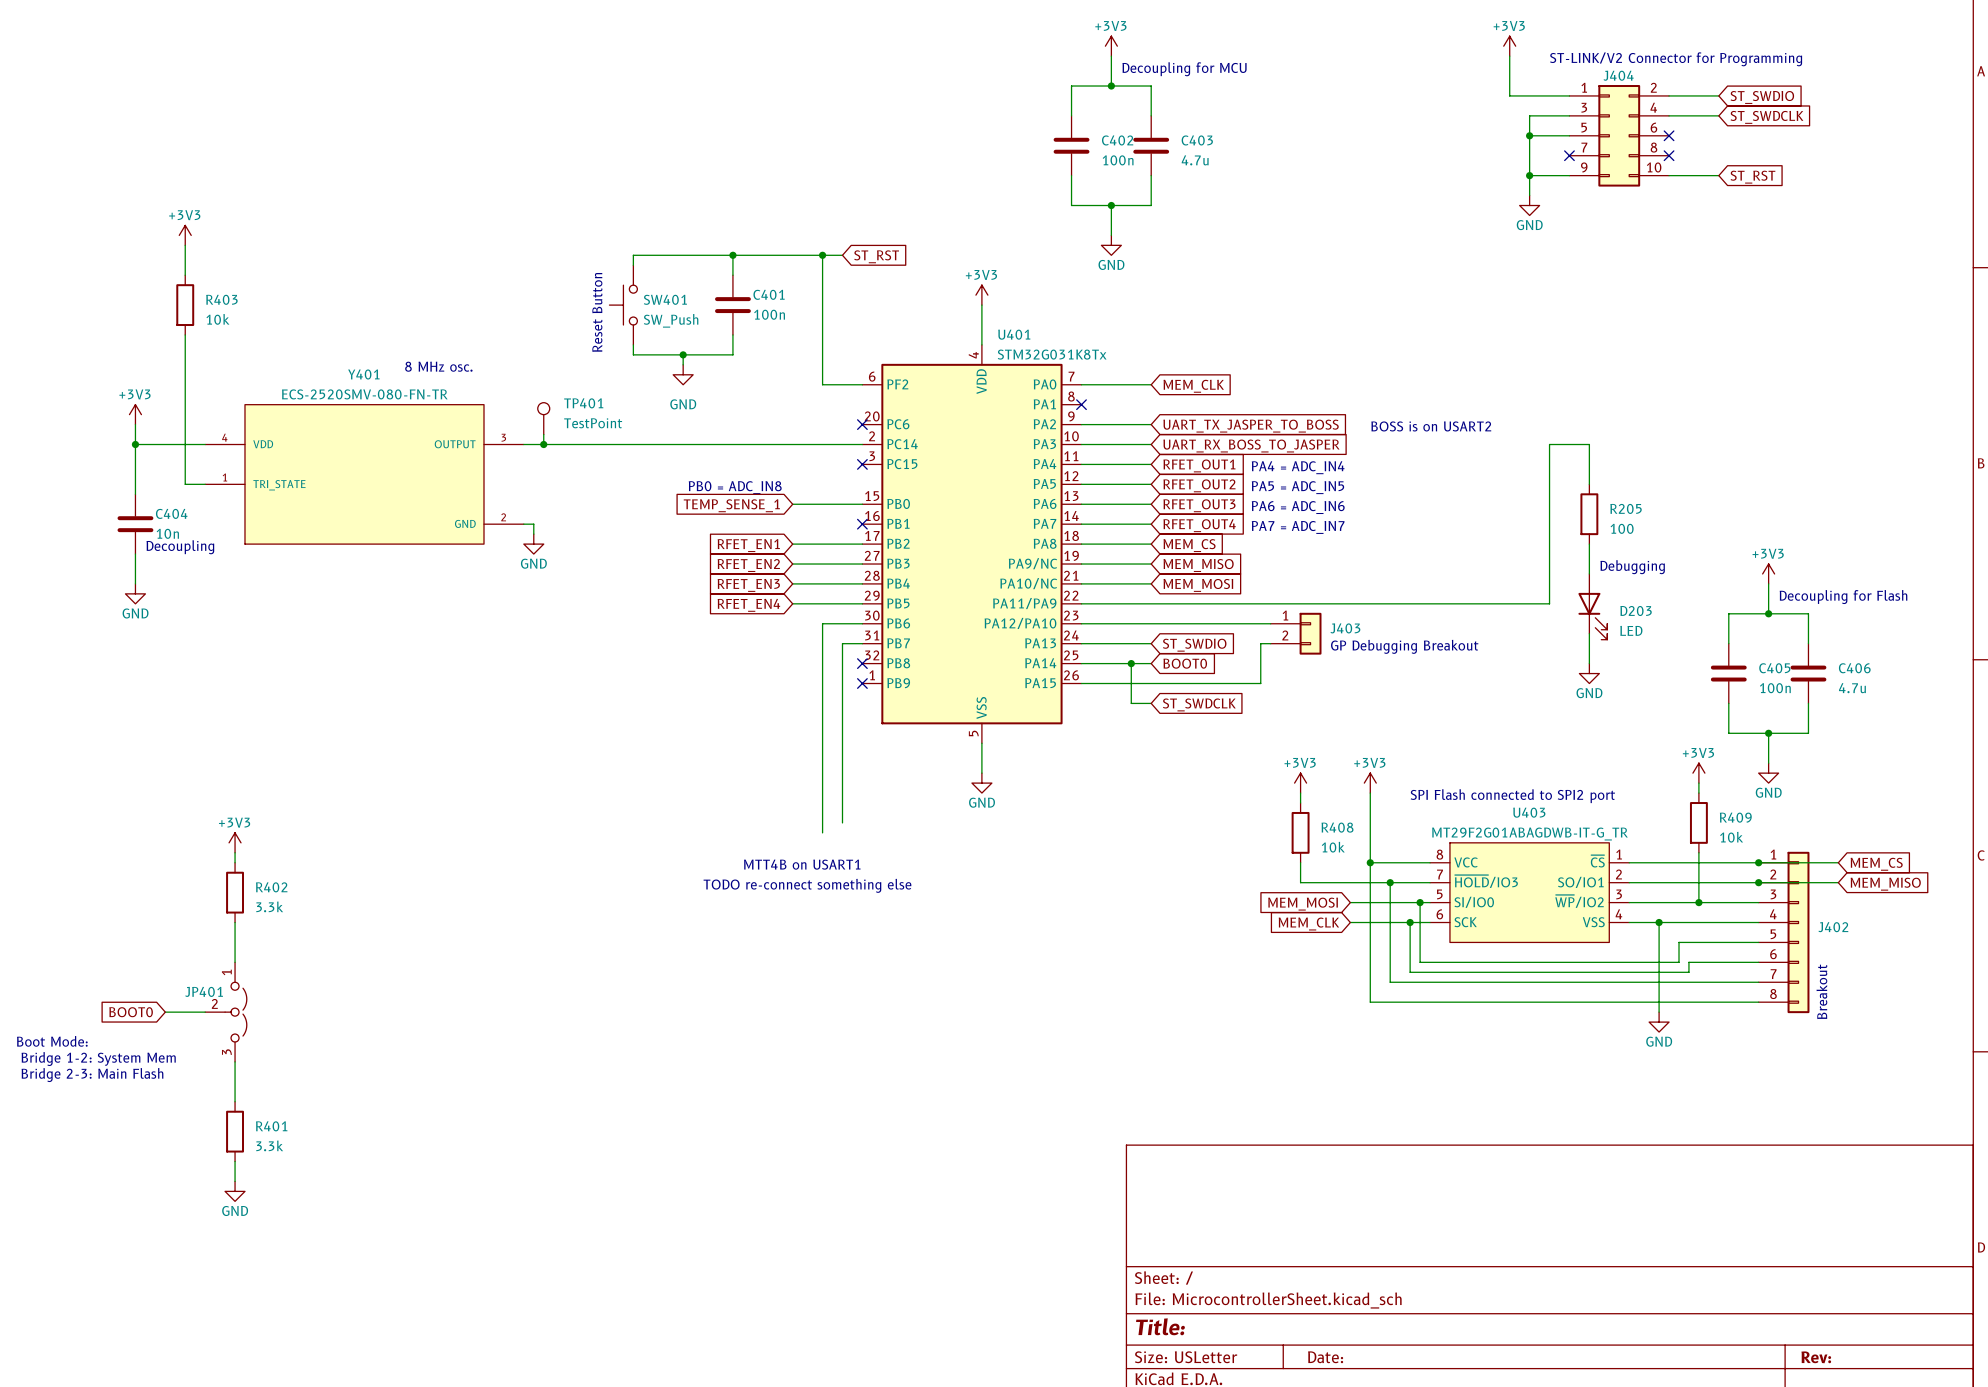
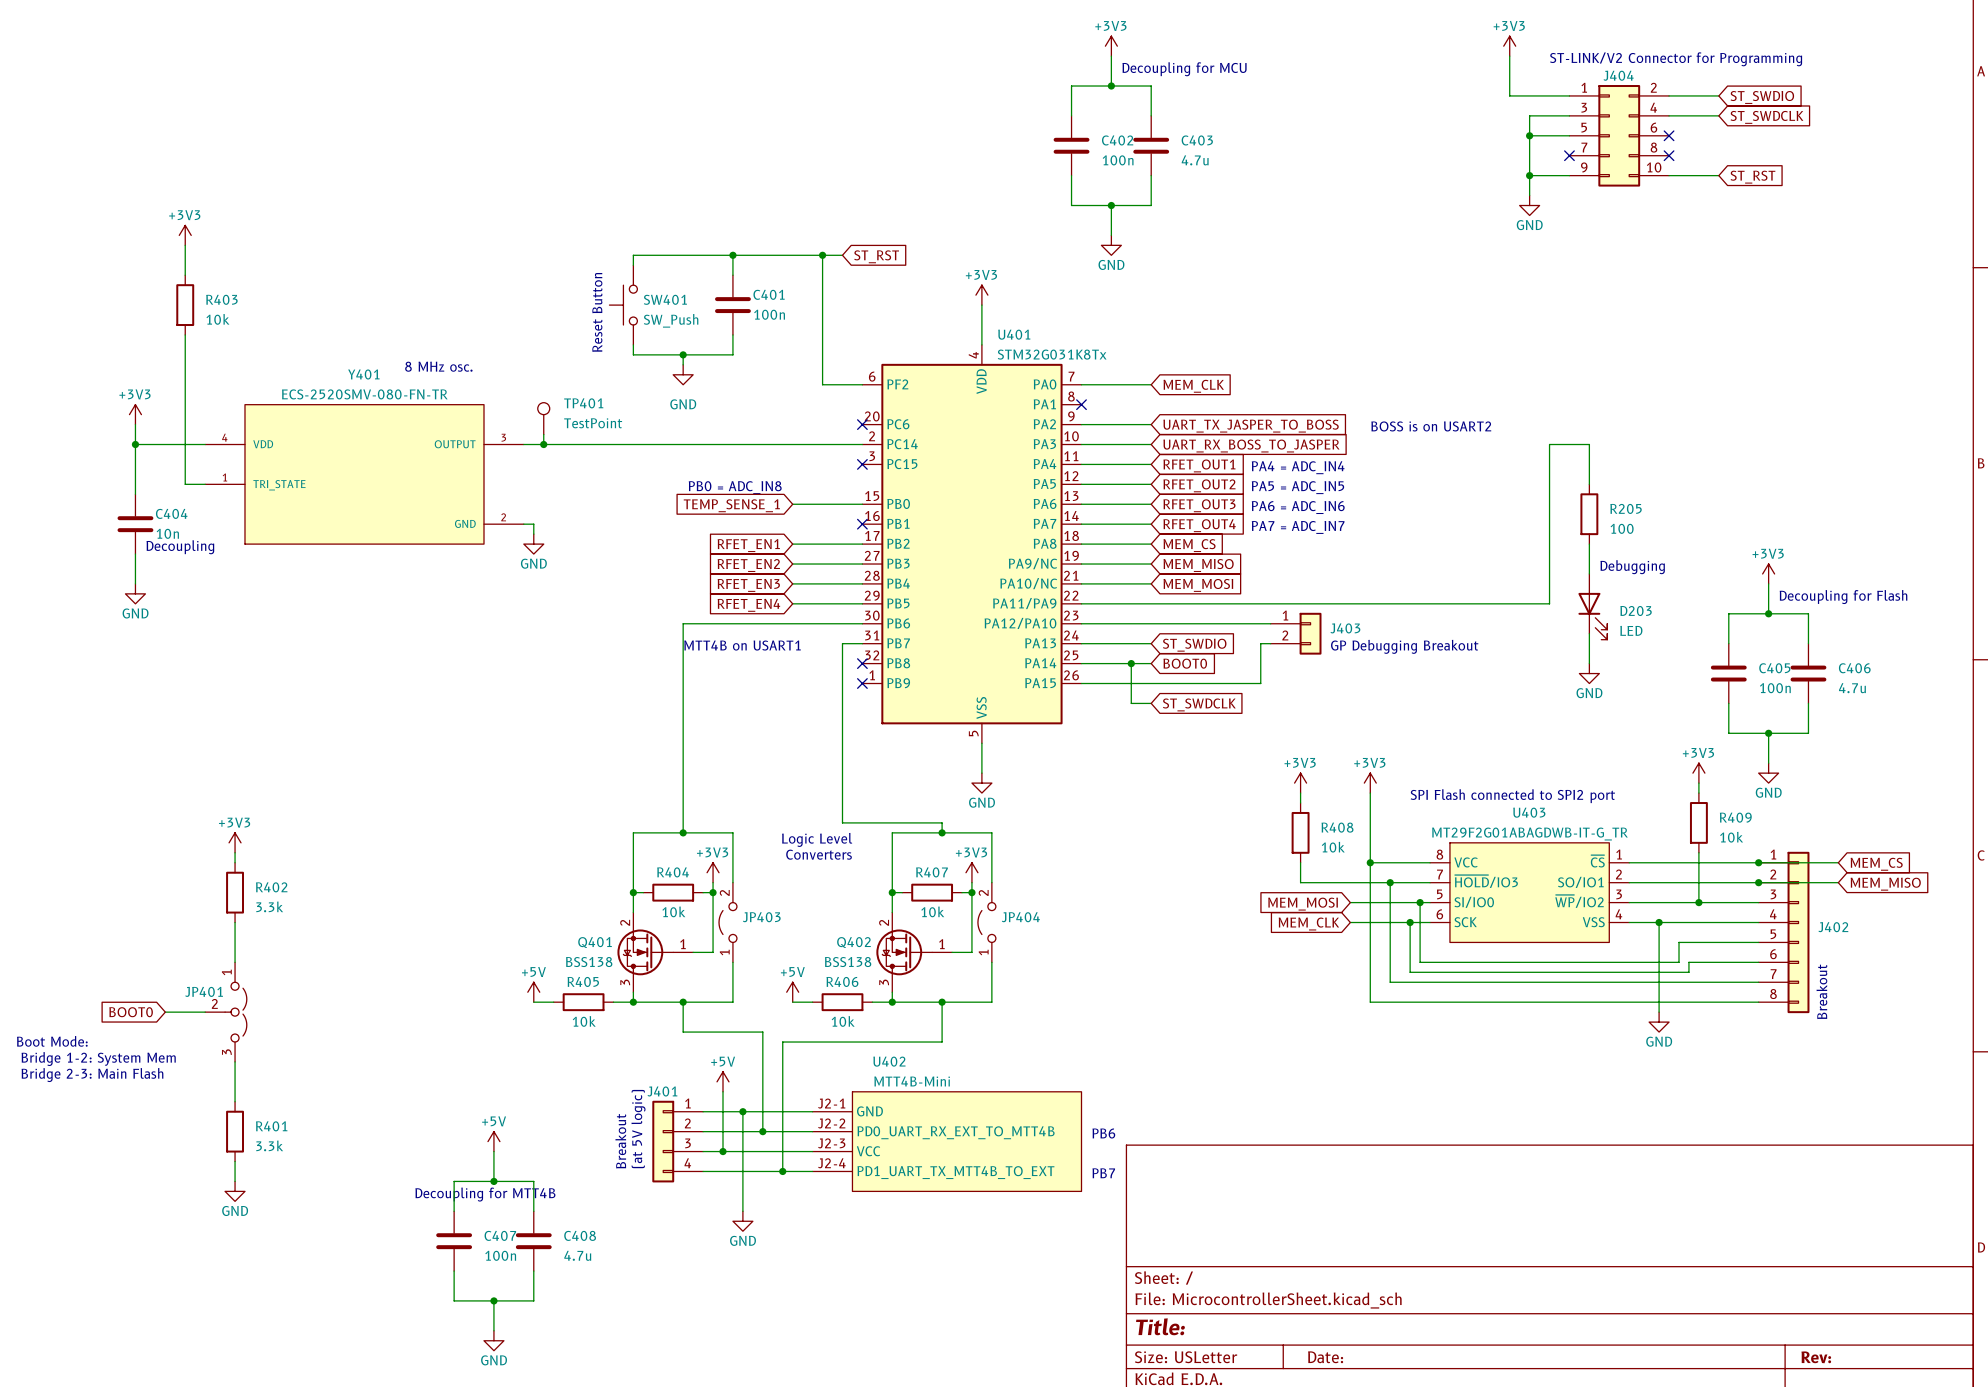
wire: (822, 623) (822, 832) -> (822, 623) (683, 623) (683, 832)
text: none -> MTT4B on USART1 (742, 645)
wire: none -> (842, 822) (942, 822) (942, 832)
junction: none -> (683, 832)
junction: none -> (942, 832)
text: none -> Logic Level (817, 839)
text: none -> Converters (819, 854)
text: MTT4B on USART1 (802, 864) -> none
power symbol: none -> +3V3 (713, 872)
power symbol: none -> +3V3 (971, 872)
wire: none -> (713, 882) (713, 952) (693, 952)
wire: none -> (732, 882) (732, 832) (633, 832) (633, 912)
wire: none -> (971, 882) (971, 952) (952, 952)
wire: none -> (991, 882) (991, 832) (892, 832) (892, 912)
text: TODO re-connect something else (807, 885) -> none
wire: none -> (633, 892) (643, 892)
junction: none -> (633, 892)
R404: none -> 10k (673, 892)
wire: none -> (703, 892) (713, 892)
junction: none -> (713, 892)
wire: none -> (892, 892) (902, 892)
junction: none -> (892, 892)
R407: none -> 10k (932, 892)
wire: none -> (961, 892) (971, 892)
junction: none -> (971, 892)
JP403: none -> (727, 922)
JP404: none -> (986, 922)
Q401: none -> BSS138 (655, 952)
Q402: none -> BSS138 (914, 952)
wire: none -> (732, 962) (732, 1002) (613, 1002)
wire: none -> (991, 962) (991, 1002) (872, 1002)
power symbol: none -> +5V (533, 992)
wire: none -> (633, 992) (633, 1002)
power symbol: none -> +5V (792, 992)
wire: none -> (892, 992) (892, 1002)
wire: none -> (533, 1002) (553, 1002)
R405: none -> 10k (583, 1002)
junction: none -> (633, 1002)
wire: none -> (683, 1002) (683, 1032) (762, 1032) (762, 1131)
junction: none -> (683, 1002)
wire: none -> (792, 1002) (812, 1002)
R406: none -> 10k (842, 1002)
junction: none -> (892, 1002)
wire: none -> (942, 1002) (942, 1042) (782, 1042) (782, 1171)
junction: none -> (942, 1002)
power symbol: none -> +5V (722, 1081)
wire: none -> (722, 1091) (722, 1151)
wire: none -> (703, 1111) (812, 1111)
wire: none -> (742, 1111) (742, 1211)
junction: none -> (742, 1111)
text: none -> (at 5V logic) (638, 1129)
wire: none -> (703, 1131) (812, 1131)
junction: none -> (762, 1131)
text: none -> PB6 (1103, 1133)
power symbol: none -> +5V (493, 1141)
text: none -> Breakout (620, 1141)
J401: none -> (677, 1141)
U402: none -> MTT4B-Mini (947, 1141)
wire: none -> (493, 1151) (493, 1181)
wire: none -> (703, 1151) (812, 1151)
junction: none -> (722, 1151)
wire: none -> (703, 1171) (812, 1171)
junction: none -> (782, 1171)
text: none -> PB7 (1103, 1173)
junction: none -> (493, 1181)
text: none -> Decoupling for MTT4B (485, 1194)
wire: none -> (454, 1211) (454, 1181) (533, 1181) (533, 1211)
power symbol: none -> GND (742, 1221)
C407: none -> 100n (454, 1241)
C408: none -> 4.7u (533, 1241)
wire: none -> (454, 1271) (454, 1300) (533, 1300) (533, 1271)
wire: none -> (493, 1300) (493, 1330)
junction: none -> (493, 1300)
power symbol: none -> GND (493, 1340)

